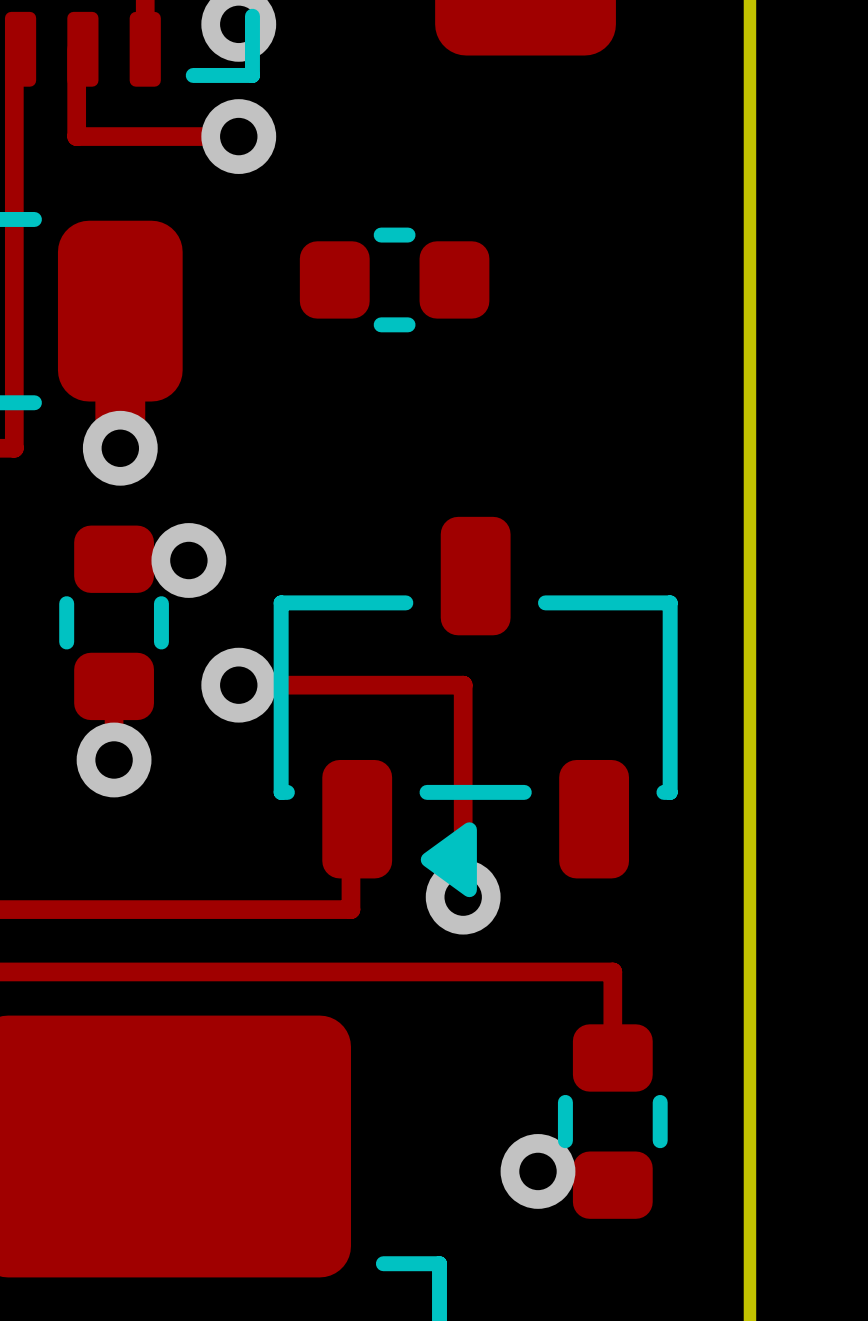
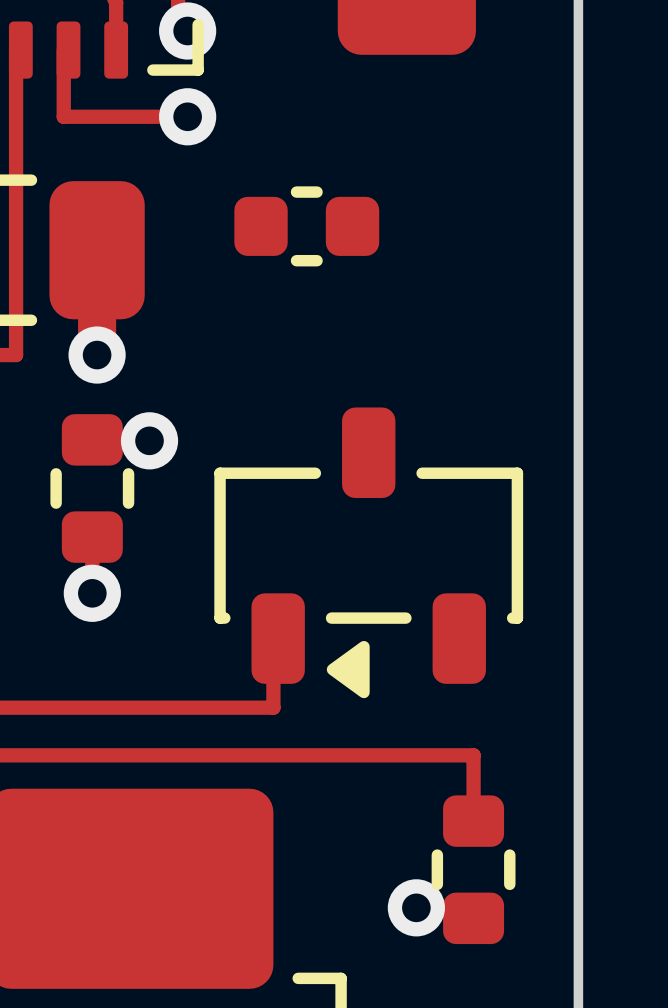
track: (238, 685) (463, 685) (463, 897) -> none
via: (238, 685) -> none
via: (463, 897) -> none

